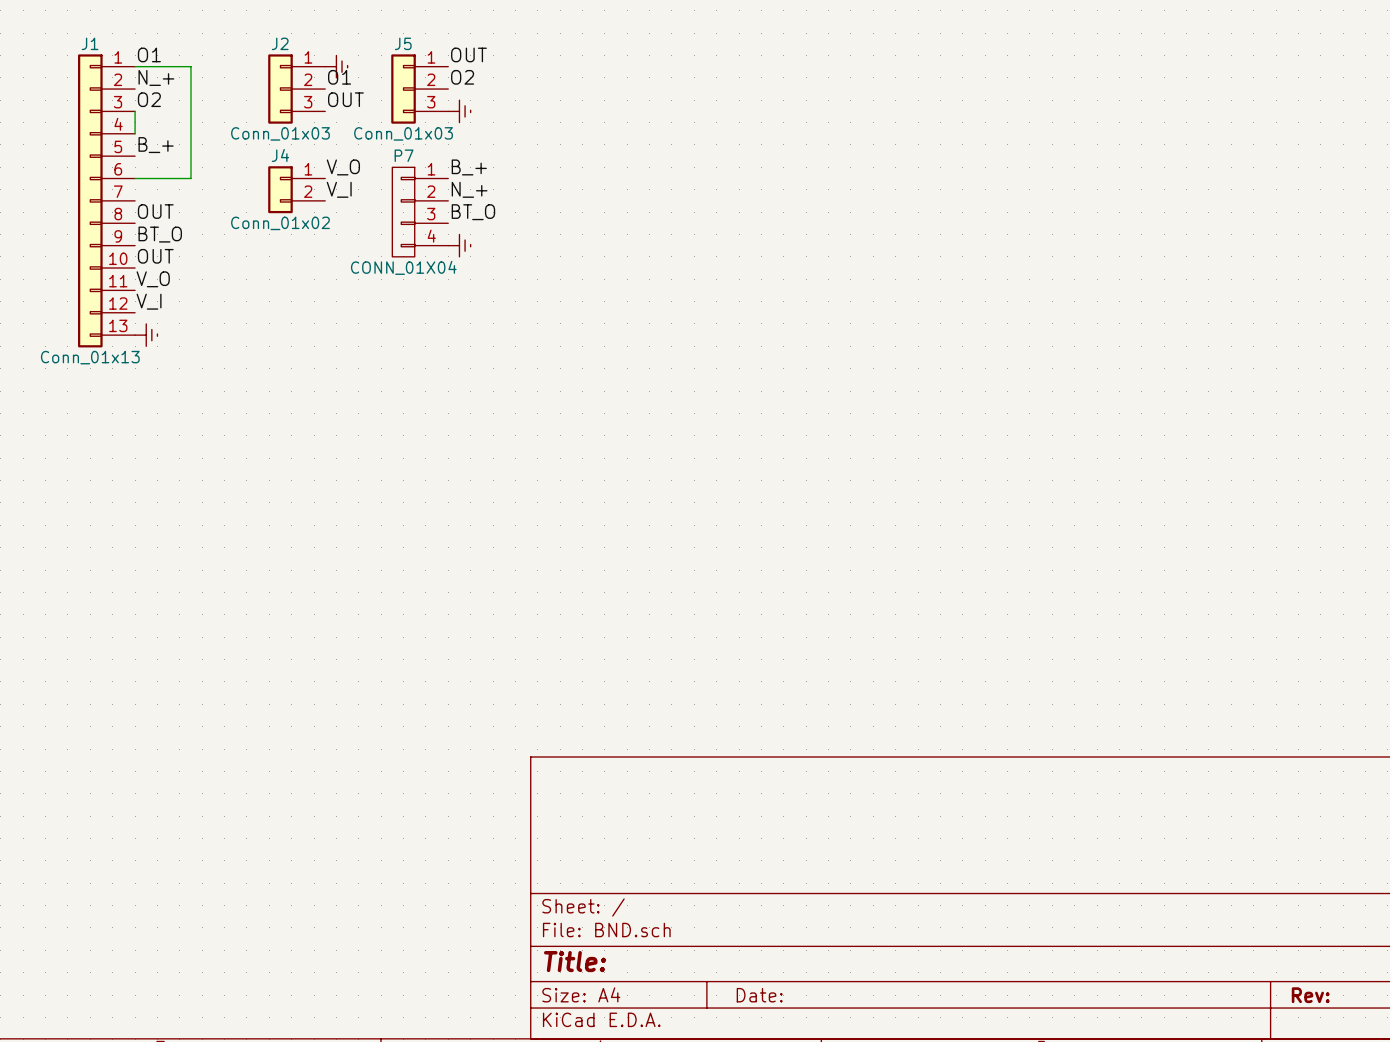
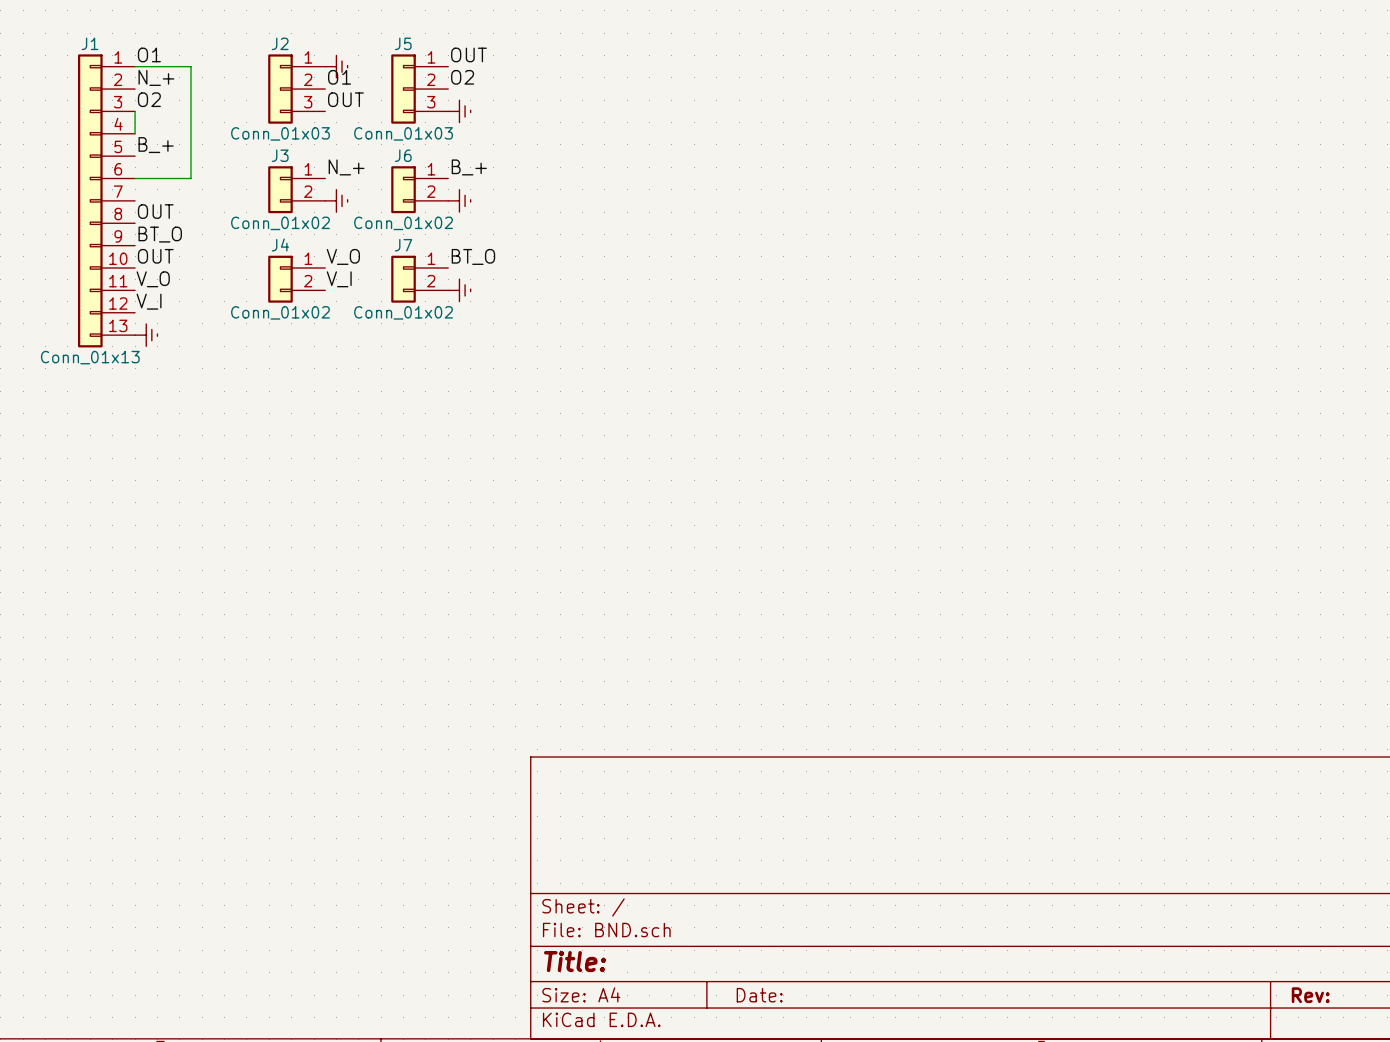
J4 name: J4 (280, 155) -> J3 (280, 155)
label: V_O (343, 167) -> N_+ (346, 167)
label position: V_I (339, 189) -> V_I (339, 279)
J6: none -> Conn_01x02 (419, 189)
label: N_+ (469, 189) -> none
power symbol: none -> (336, 200)
power symbol: none -> (459, 200)
P7: CONN_01X04 (420, 212) -> none
label position: BT_O (473, 212) -> BT_O (473, 256)
power symbol: (459, 245) -> none
label: none -> V_O (343, 256)
J4: none -> Conn_01x02 (296, 279)
J7: none -> Conn_01x02 (419, 279)
power symbol: none -> (459, 290)

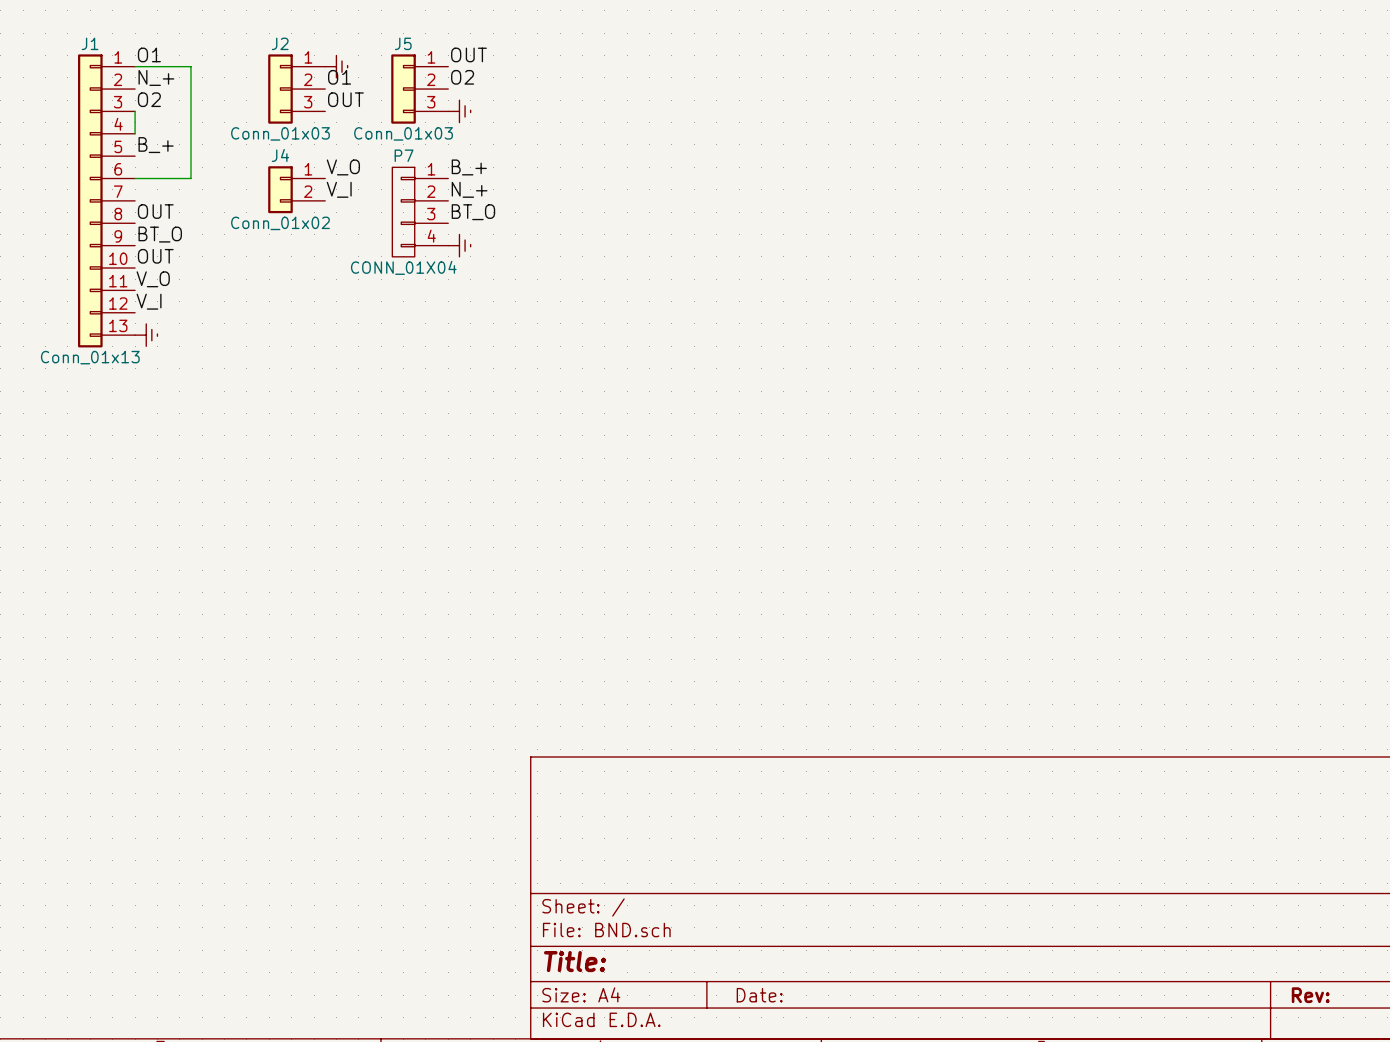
J3 name: J3 (280, 155) -> J4 (280, 155)
label: N_+ (346, 167) -> V_O (343, 167)
J6: Conn_01x02 (419, 189) -> none
label: none -> N_+ (469, 189)
power symbol: (336, 200) -> none
power symbol: (459, 200) -> none
P7: none -> CONN_01X04 (420, 212)
power symbol: none -> (459, 245)
label: V_O (343, 256) -> none
label position: BT_O (473, 256) -> BT_O (473, 212)
J4: Conn_01x02 (296, 279) -> none
label position: V_I (339, 279) -> V_I (339, 189)
J7: Conn_01x02 (419, 279) -> none
power symbol: (459, 290) -> none

